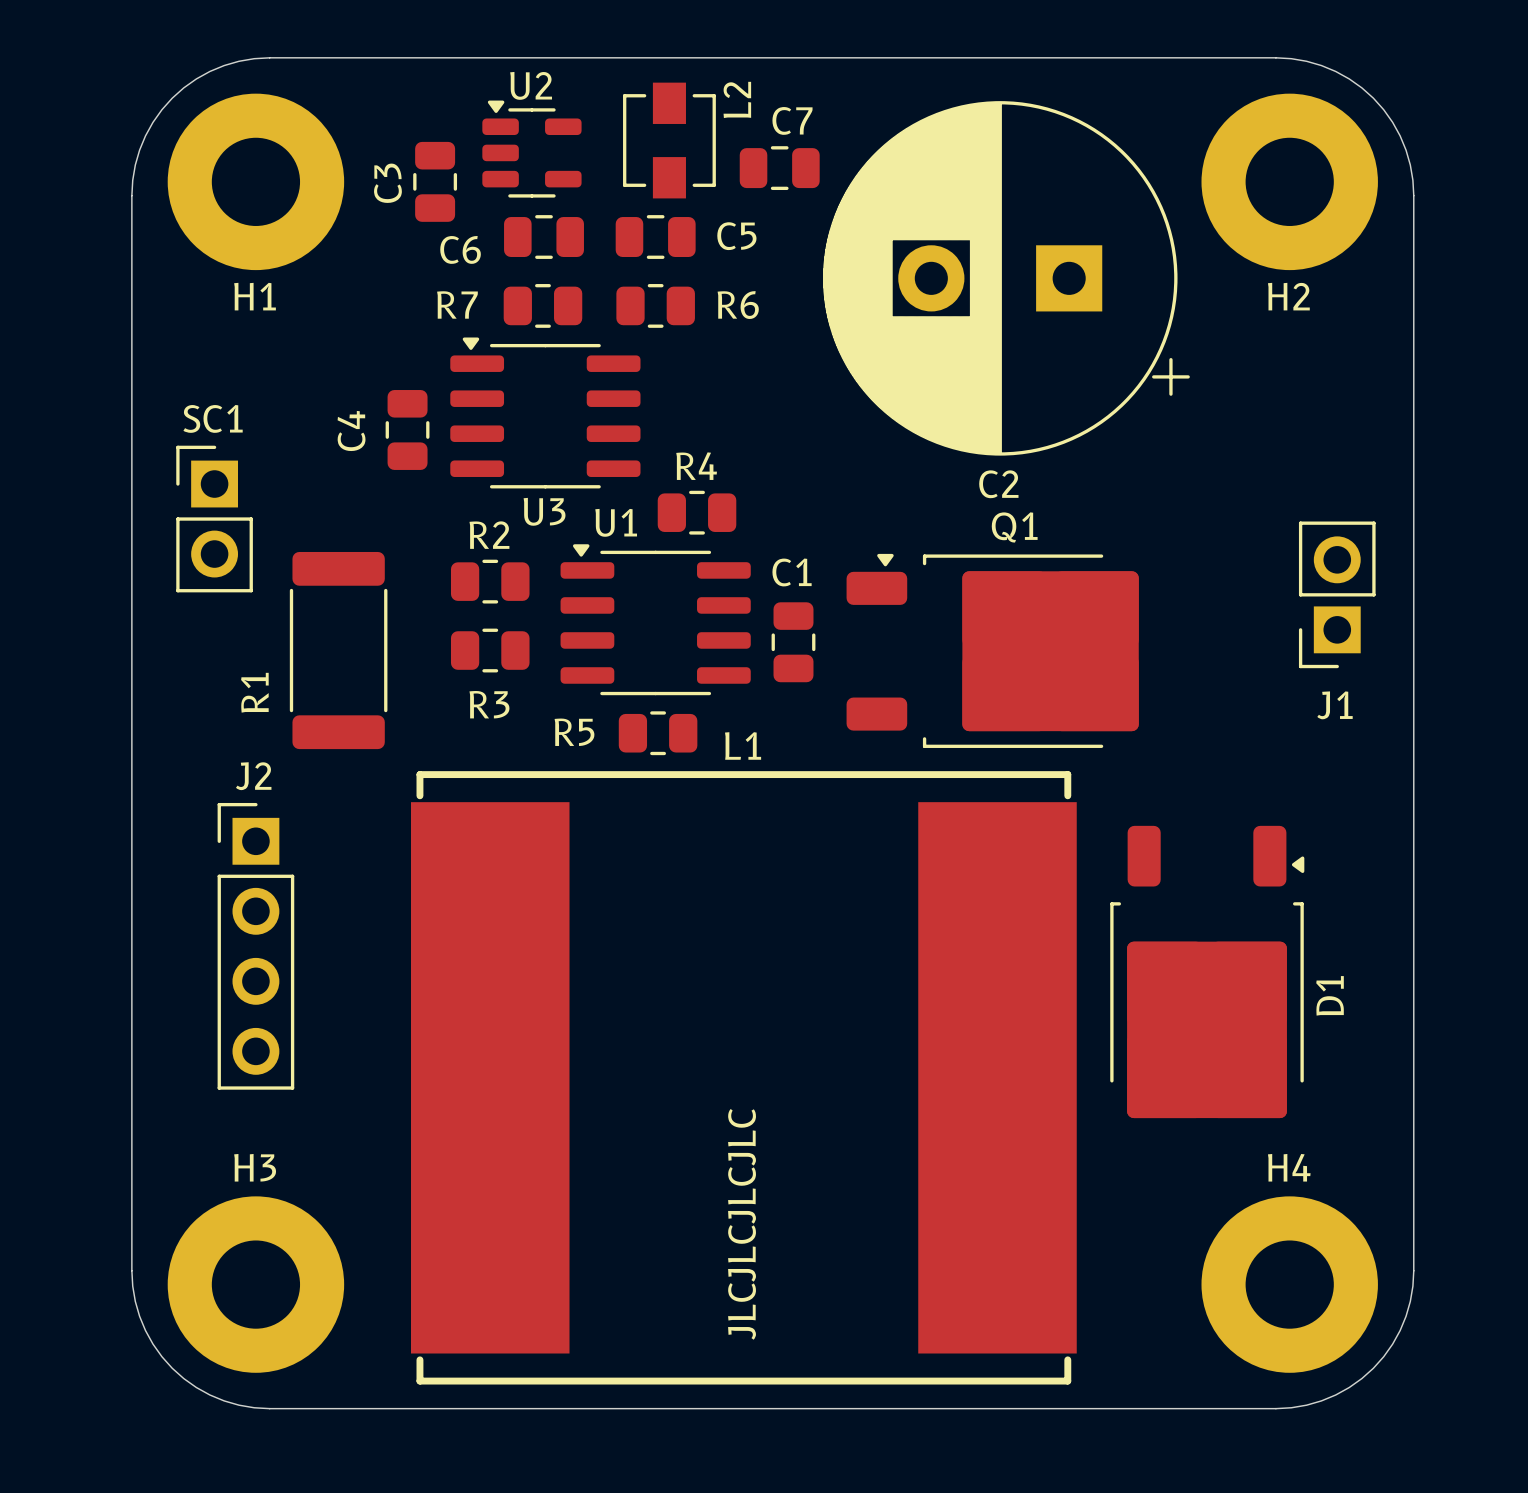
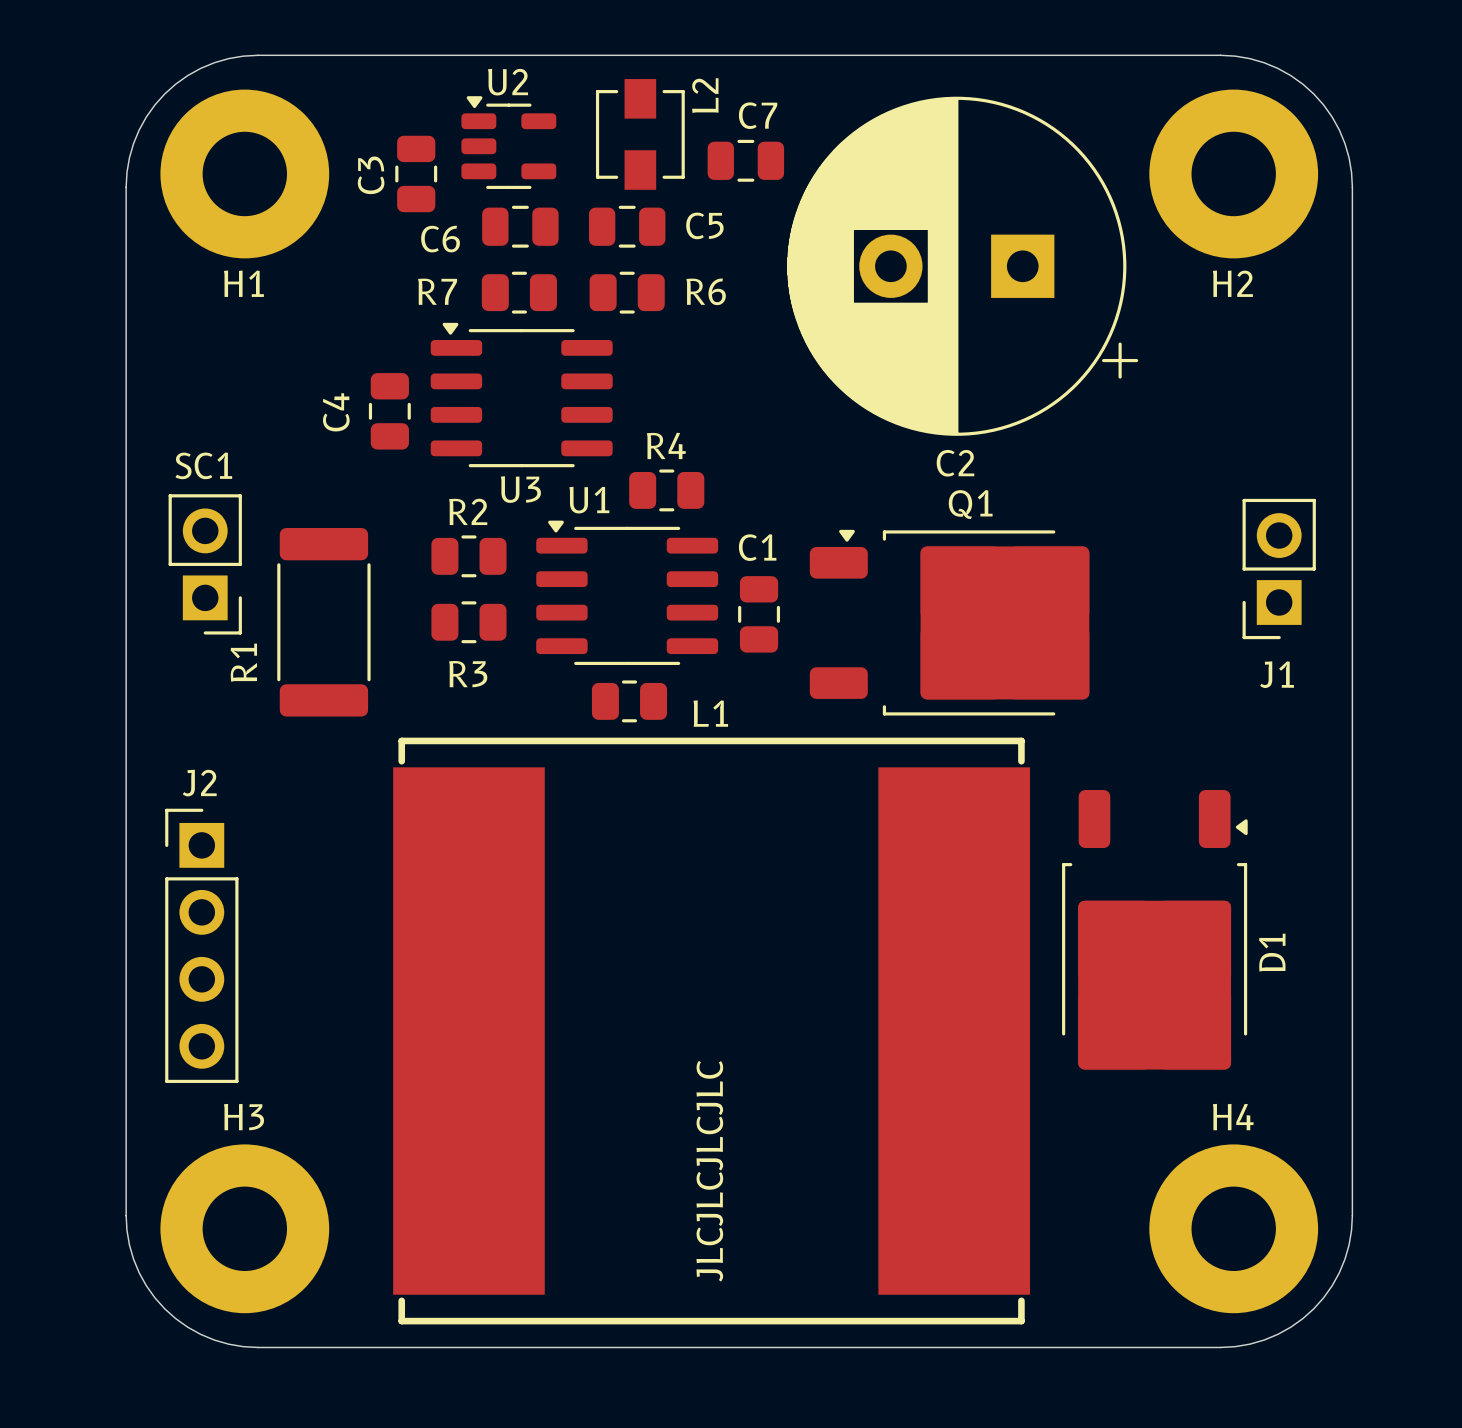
SC1 rotation: 0° (214, 519) -> 180° (205, 564)
R5 name: R5 (574, 732) -> none
J2 position: (255, 946) -> (201, 945)

